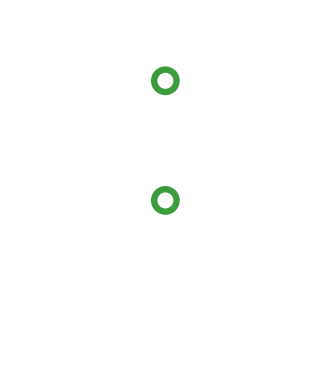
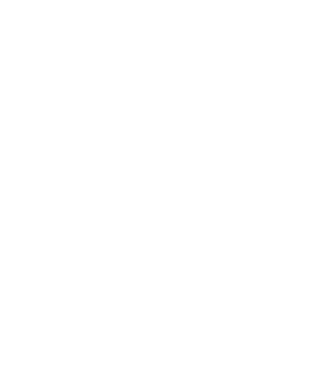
part: (165, 80) -> none
part: (165, 200) -> none

